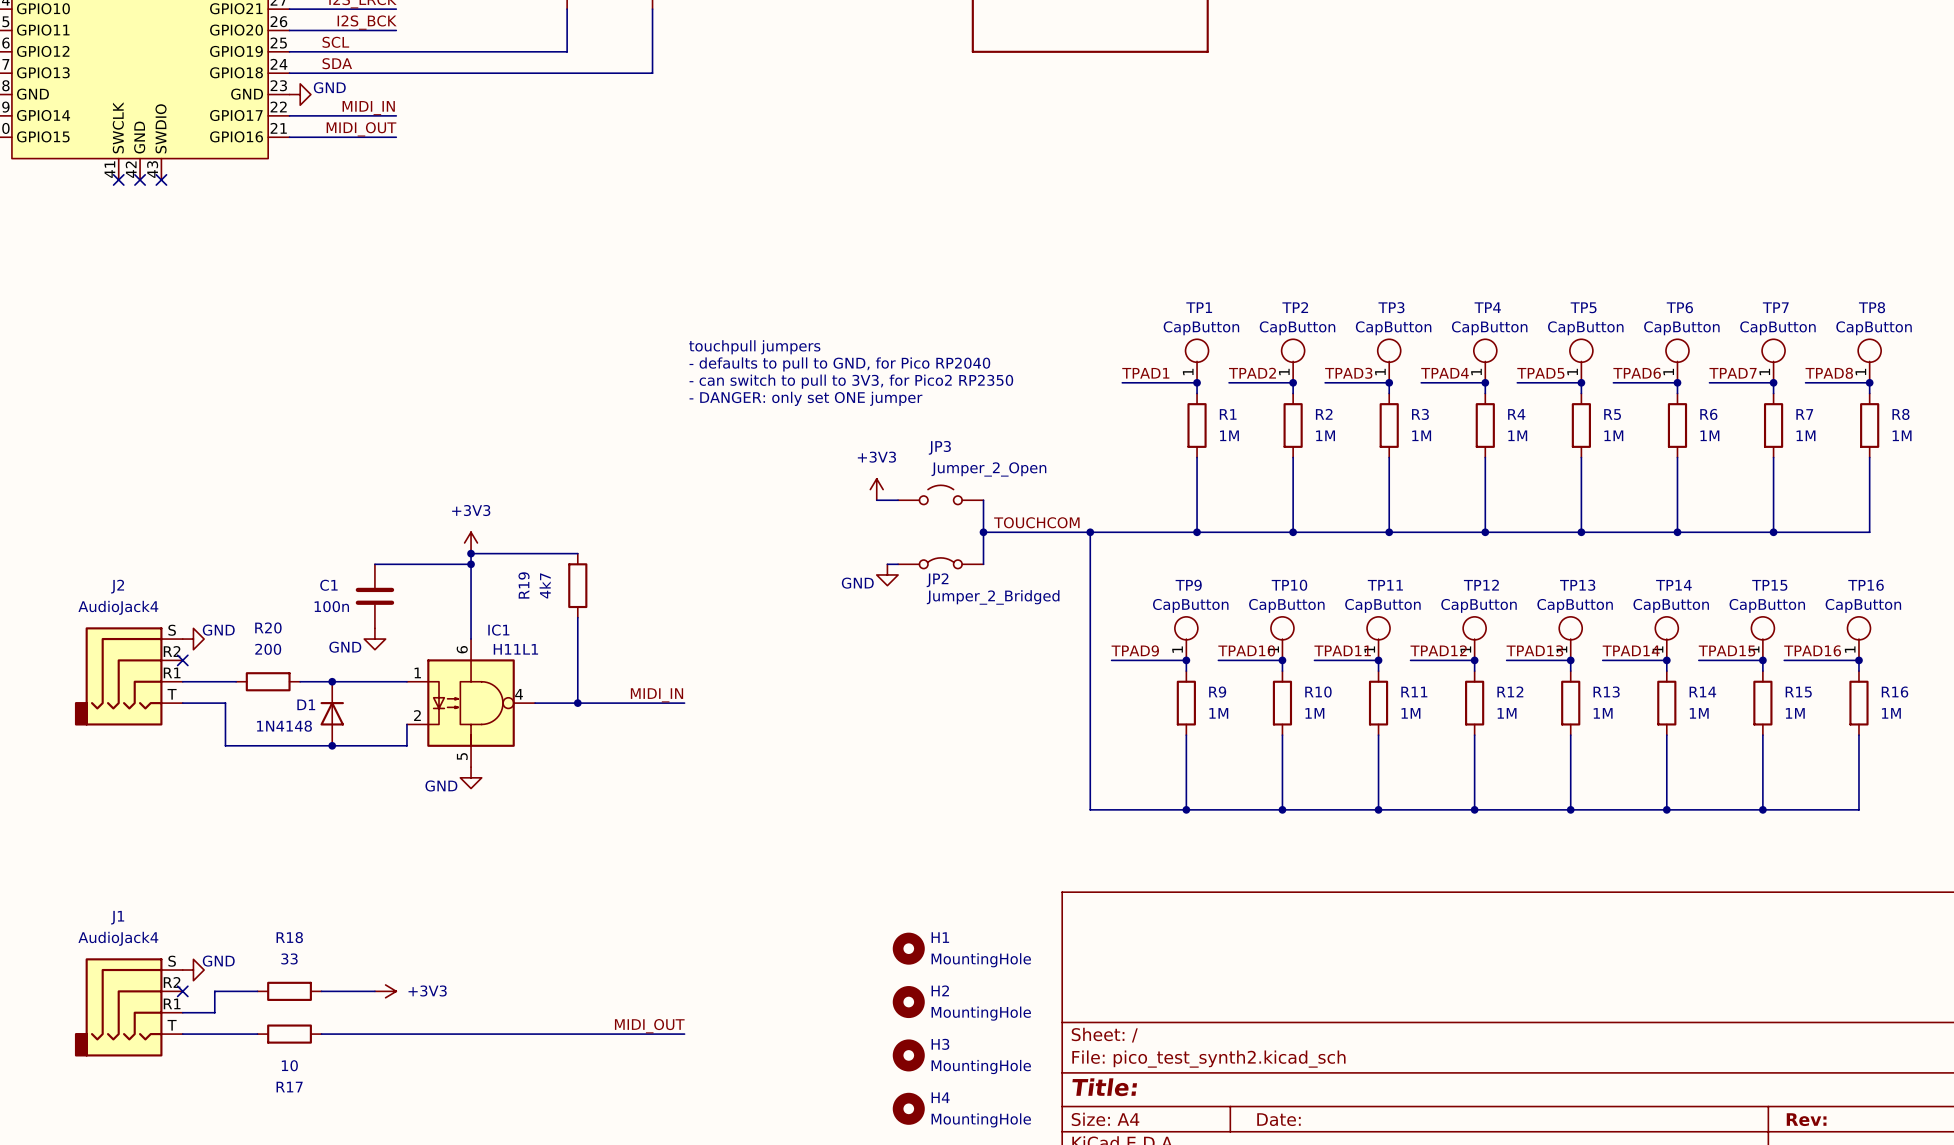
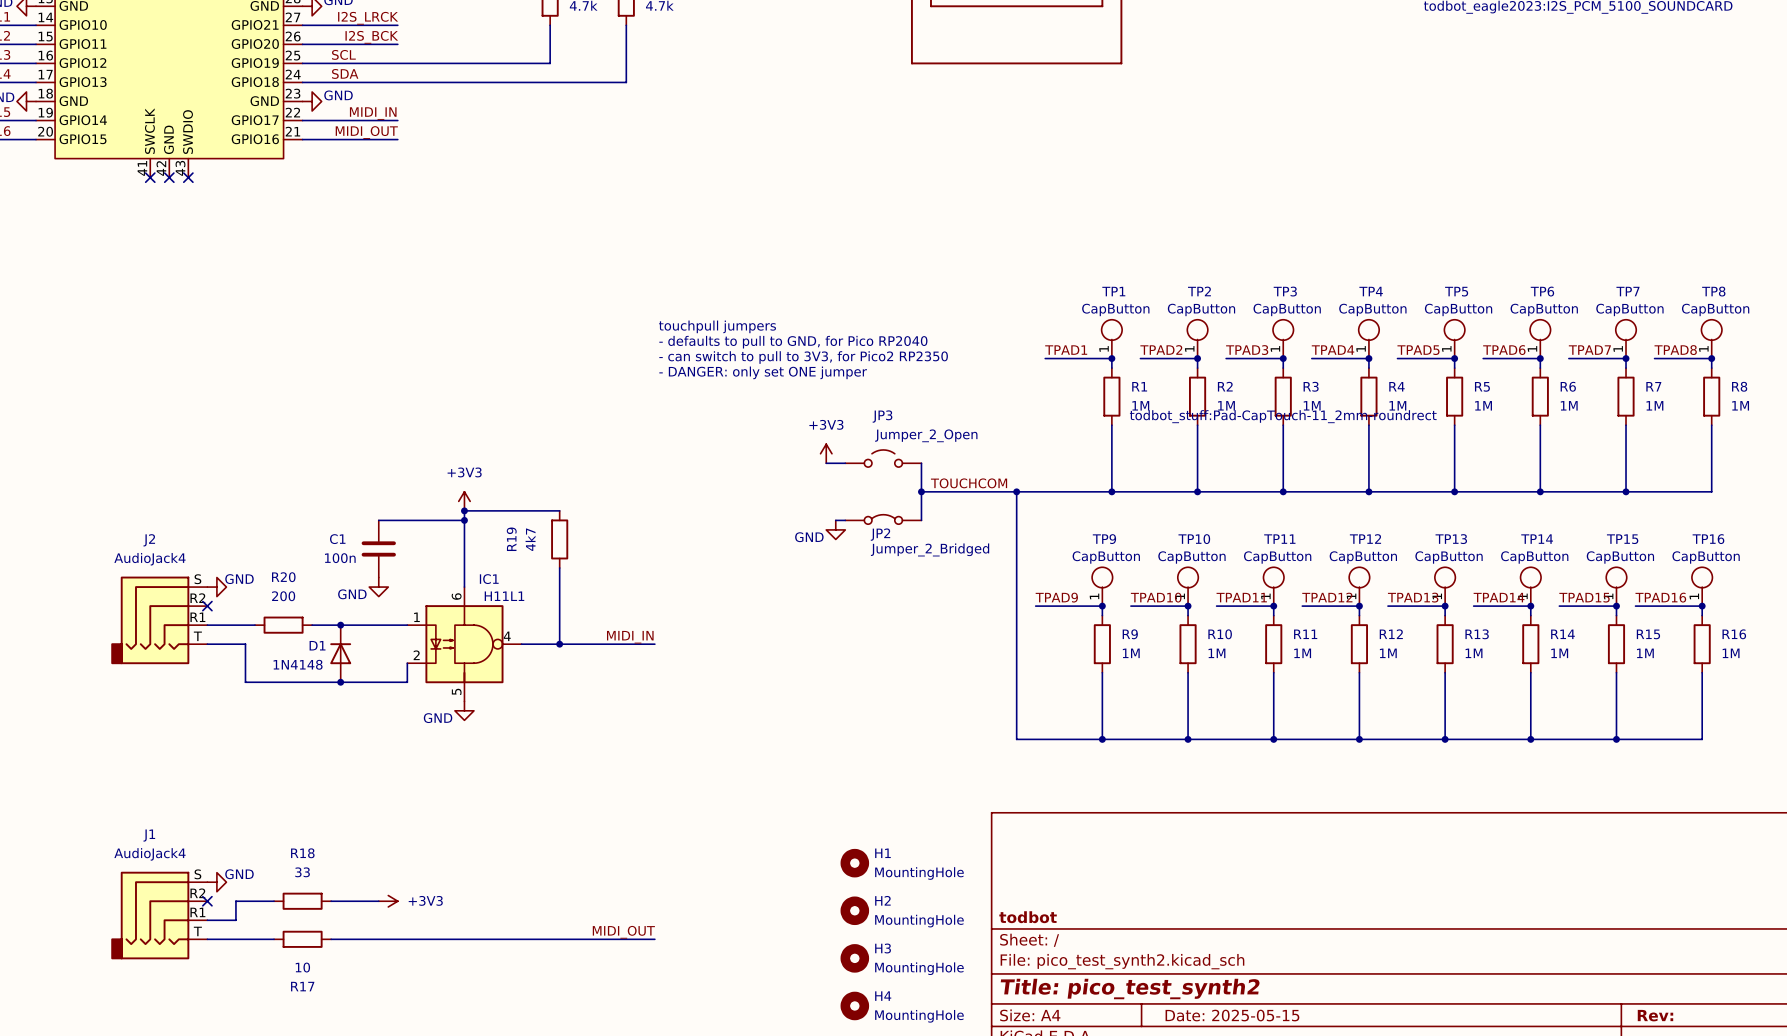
TP3 text: none -> todbot_stuff:Pad-CapTouch-11_2mm-roundrect (1283, 416)
title block: none -> todbot (1028, 917)
title block: Title: (1104, 1087) -> Title: pico_test_synth2 (1130, 989)
title block: Date: (1278, 1119) -> Date: 2025-05-15 (1232, 1015)

